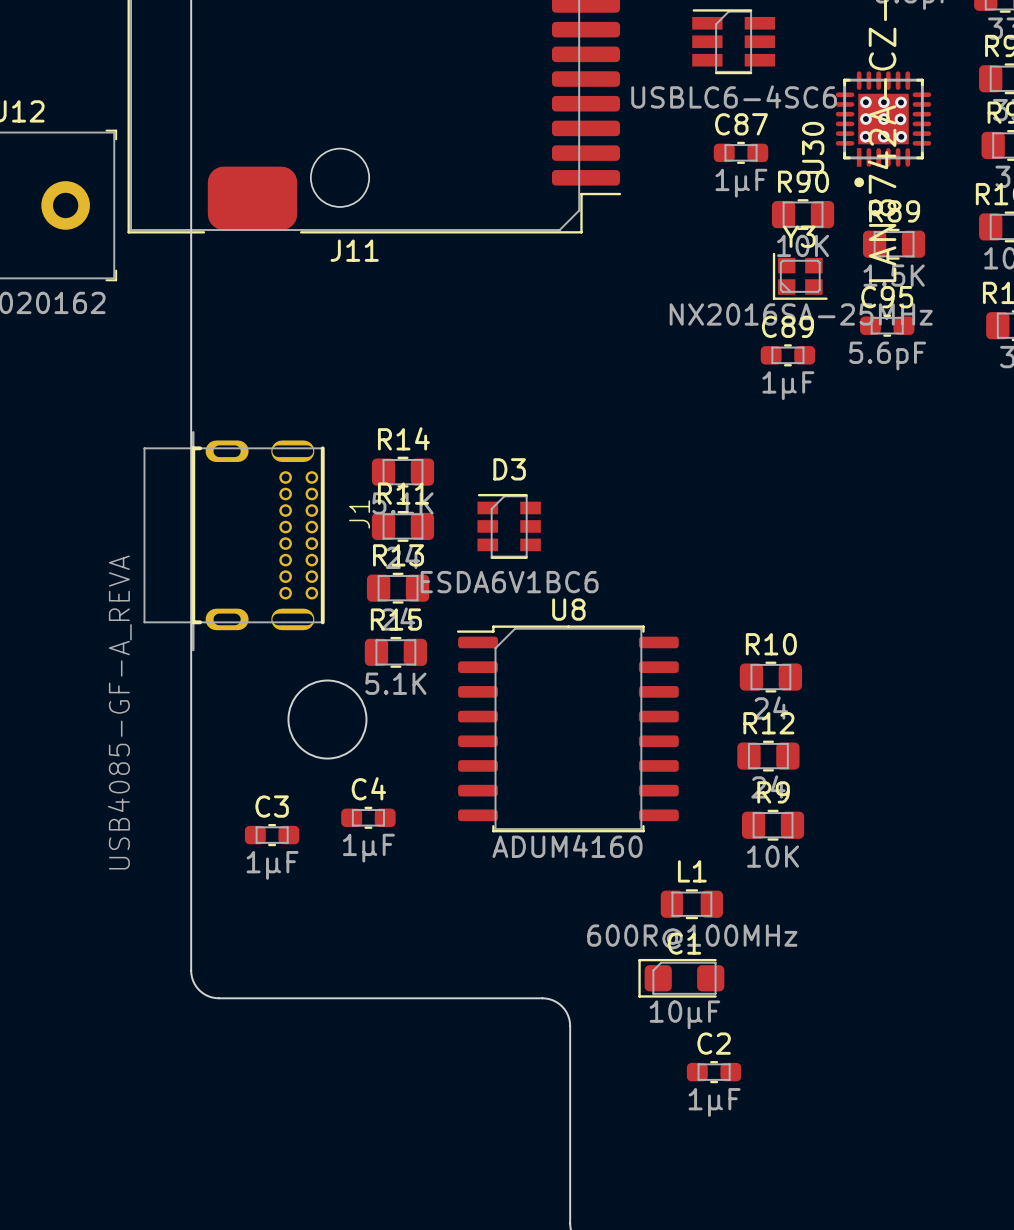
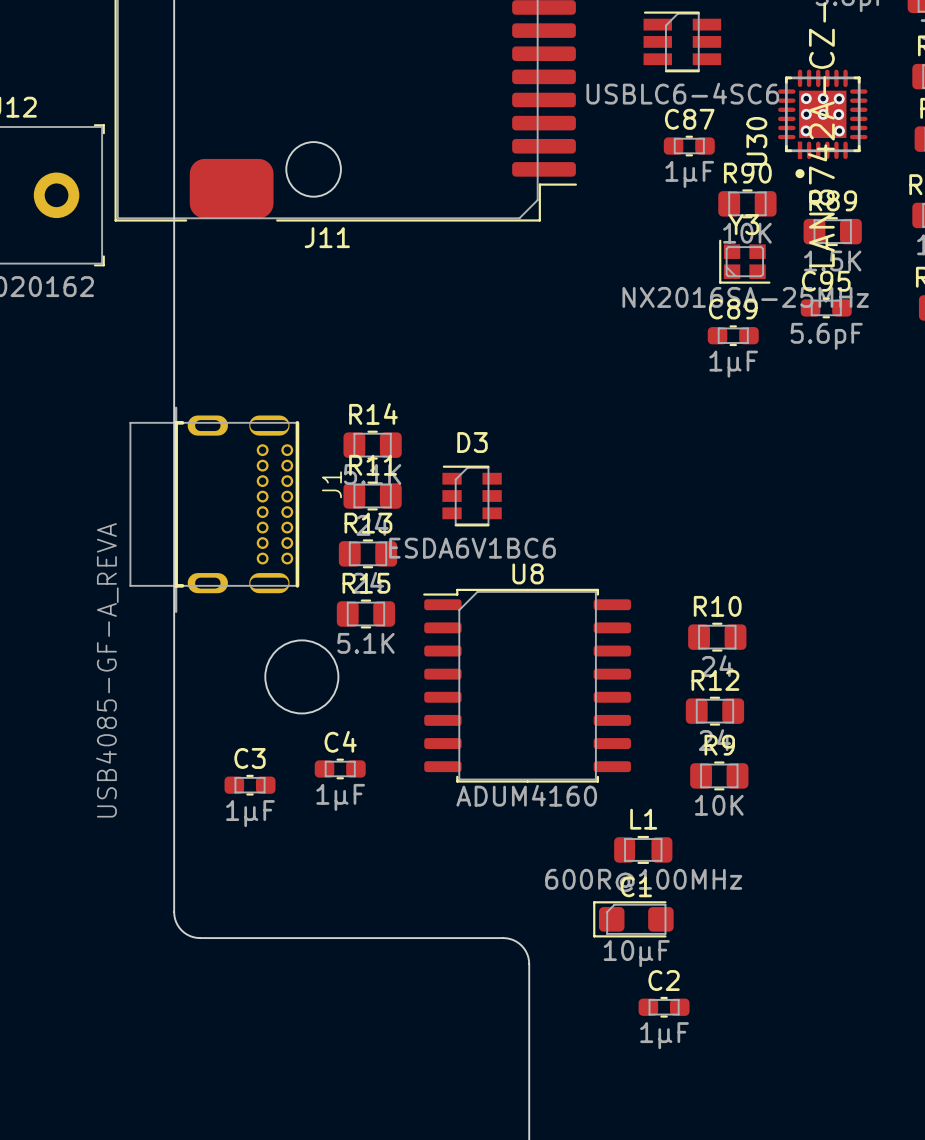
via: (883, 136) -> none

